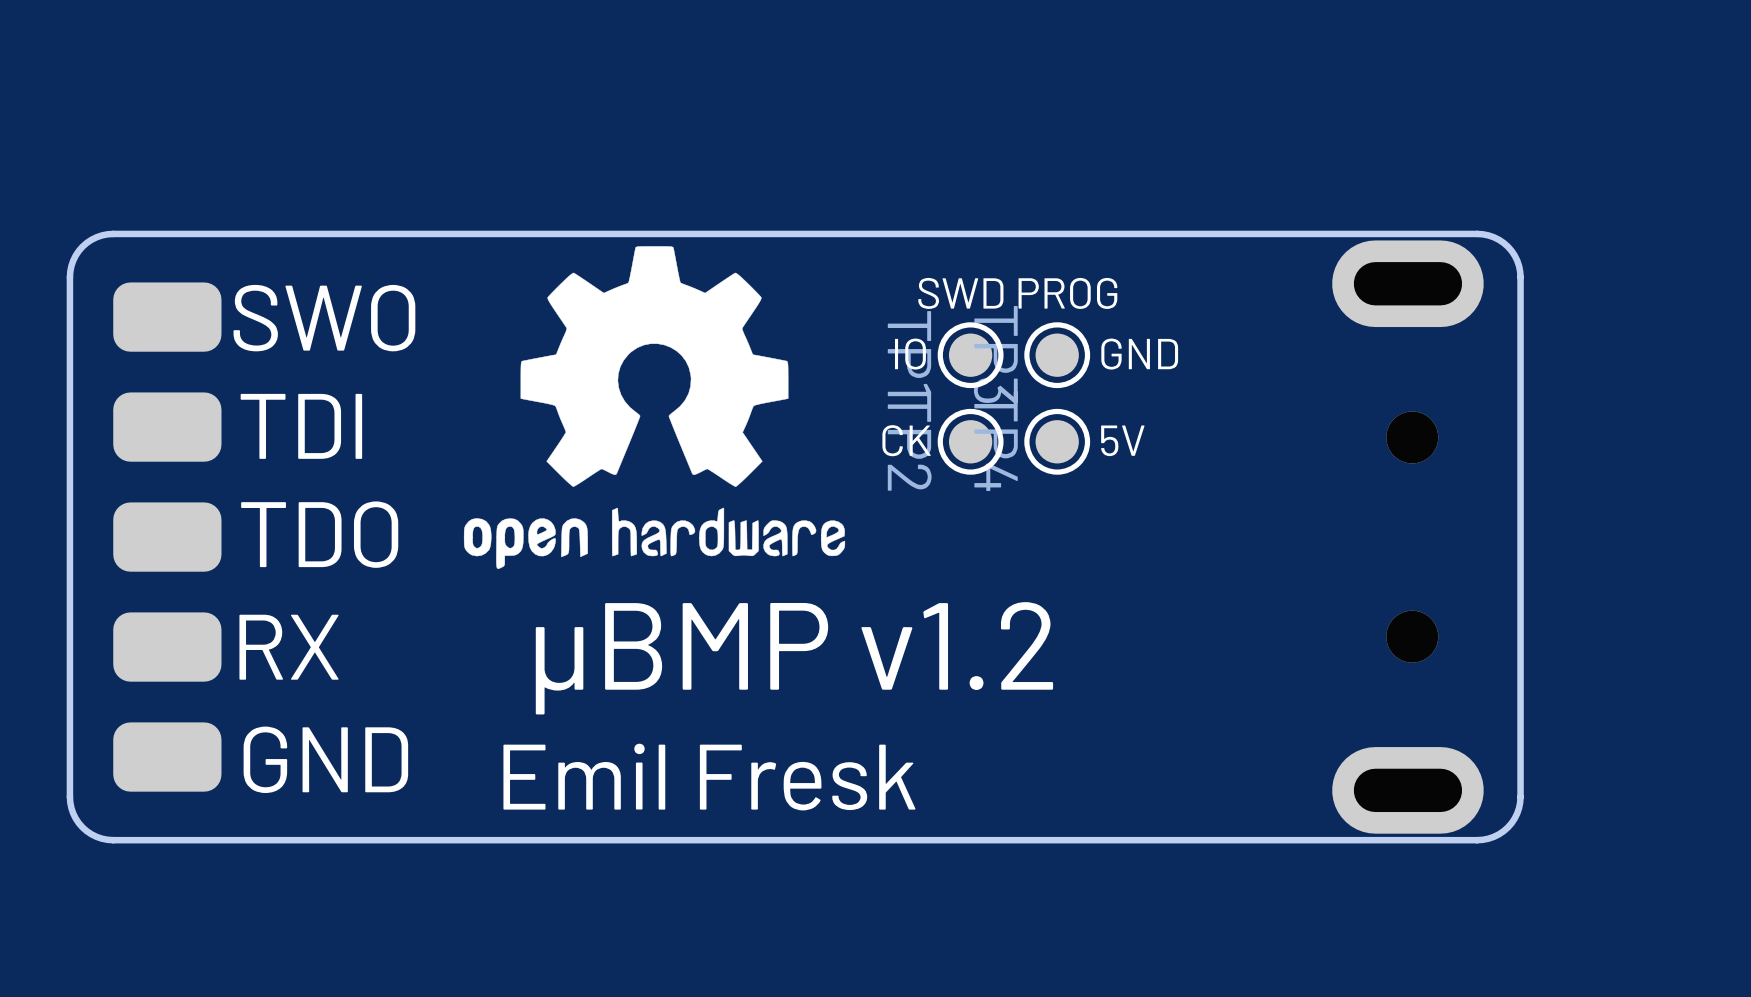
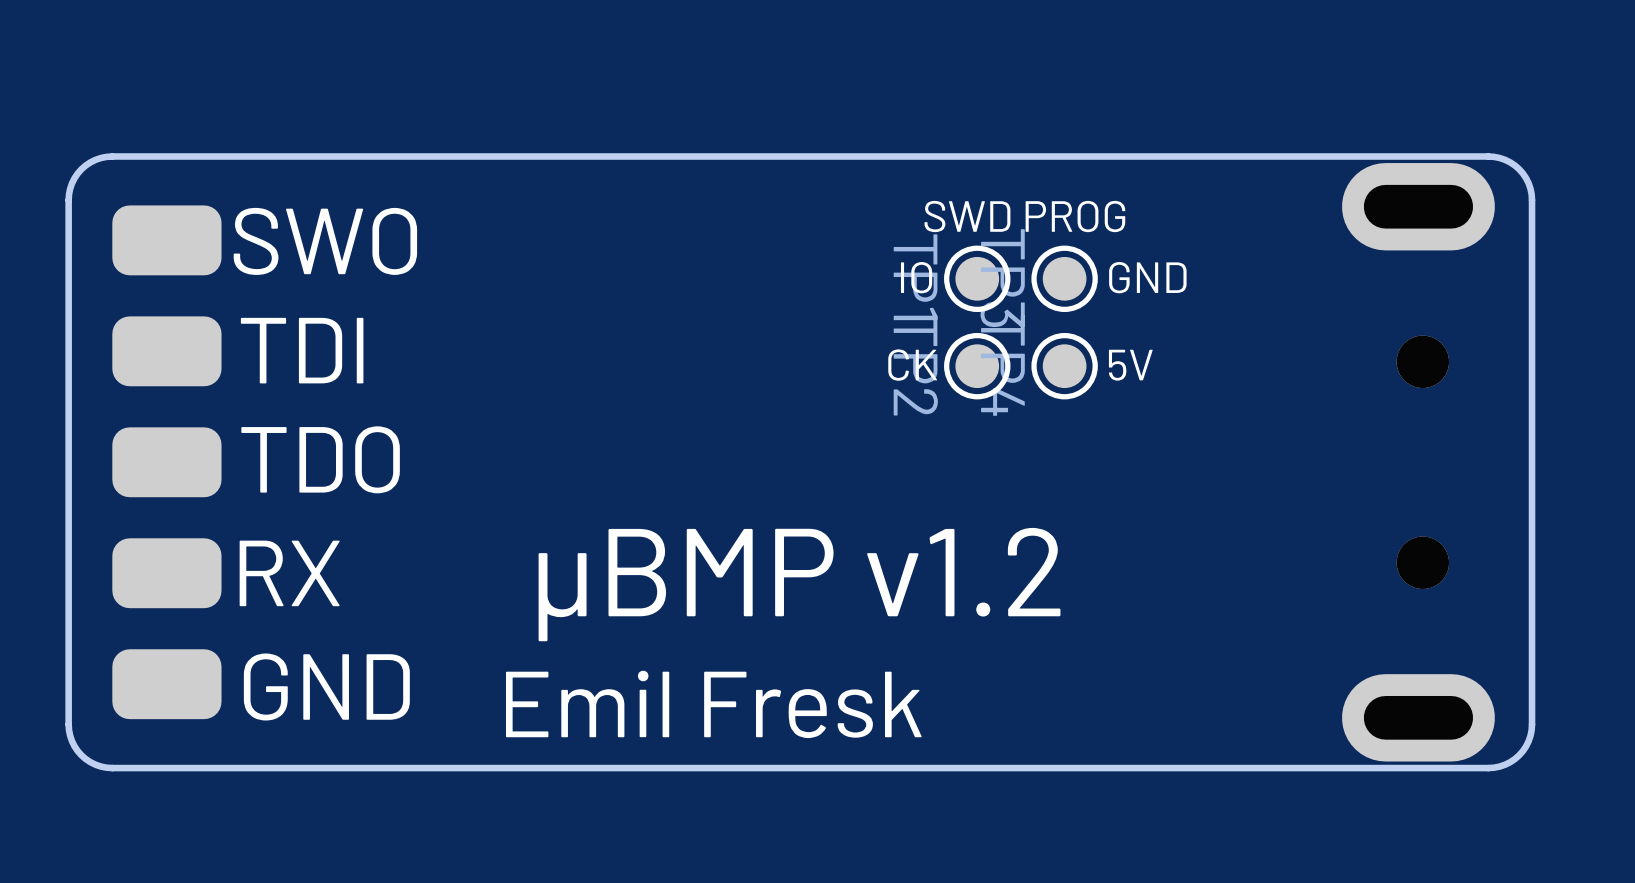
drawing: [463, 246, 846, 569] -> none

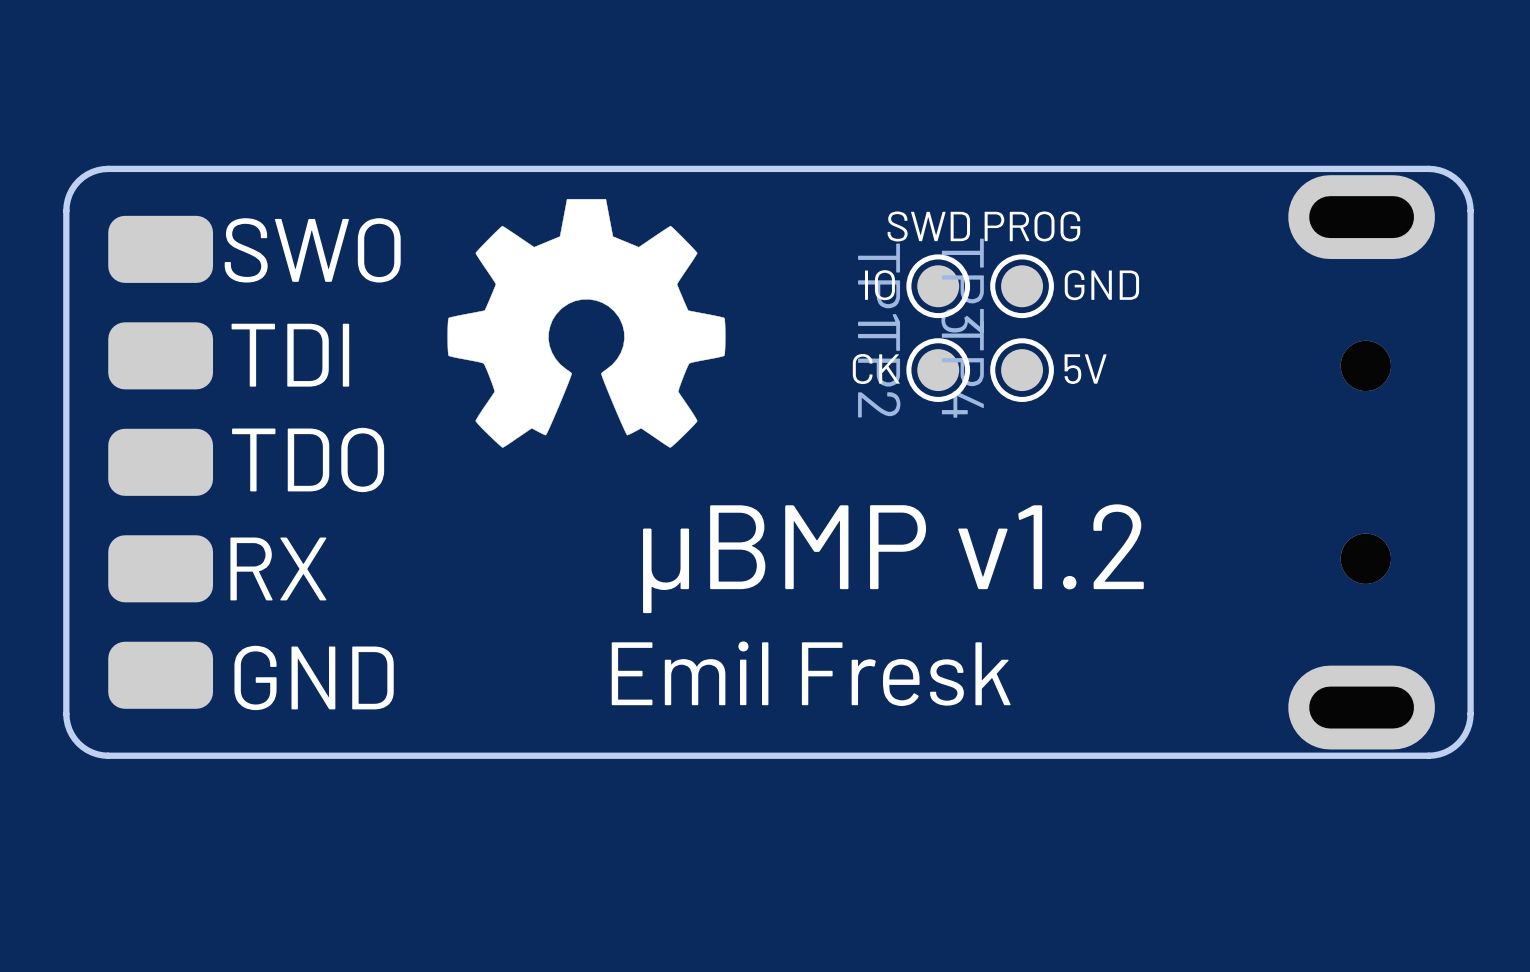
drawing: none -> [447, 199, 726, 448]
text position: µBMP v1.2 (799, 584) -> µBMP v1.2 (893, 558)
text position: Emil Fresk (713, 704) -> Emil Fresk (811, 673)

